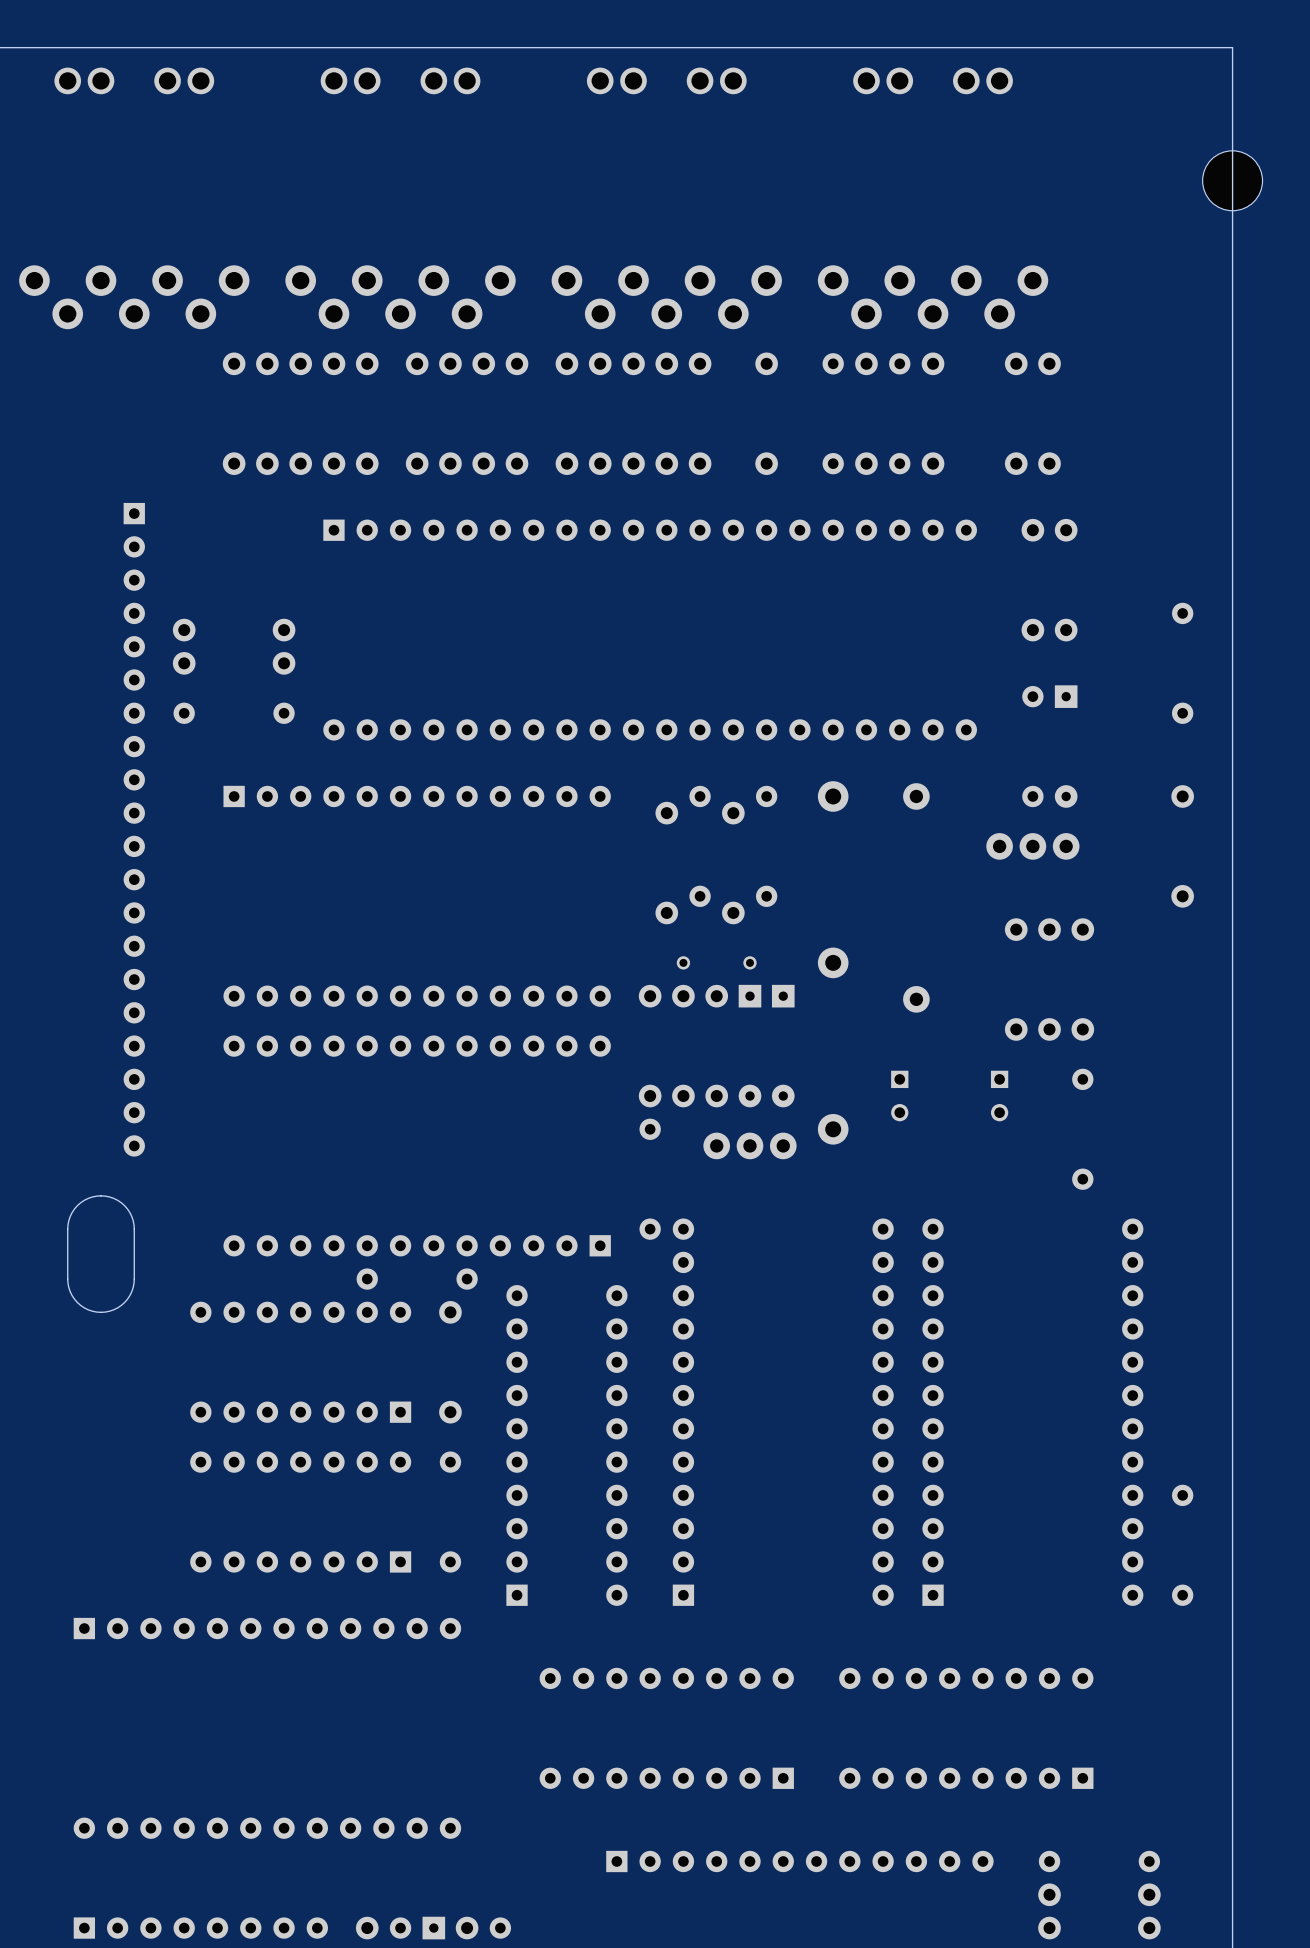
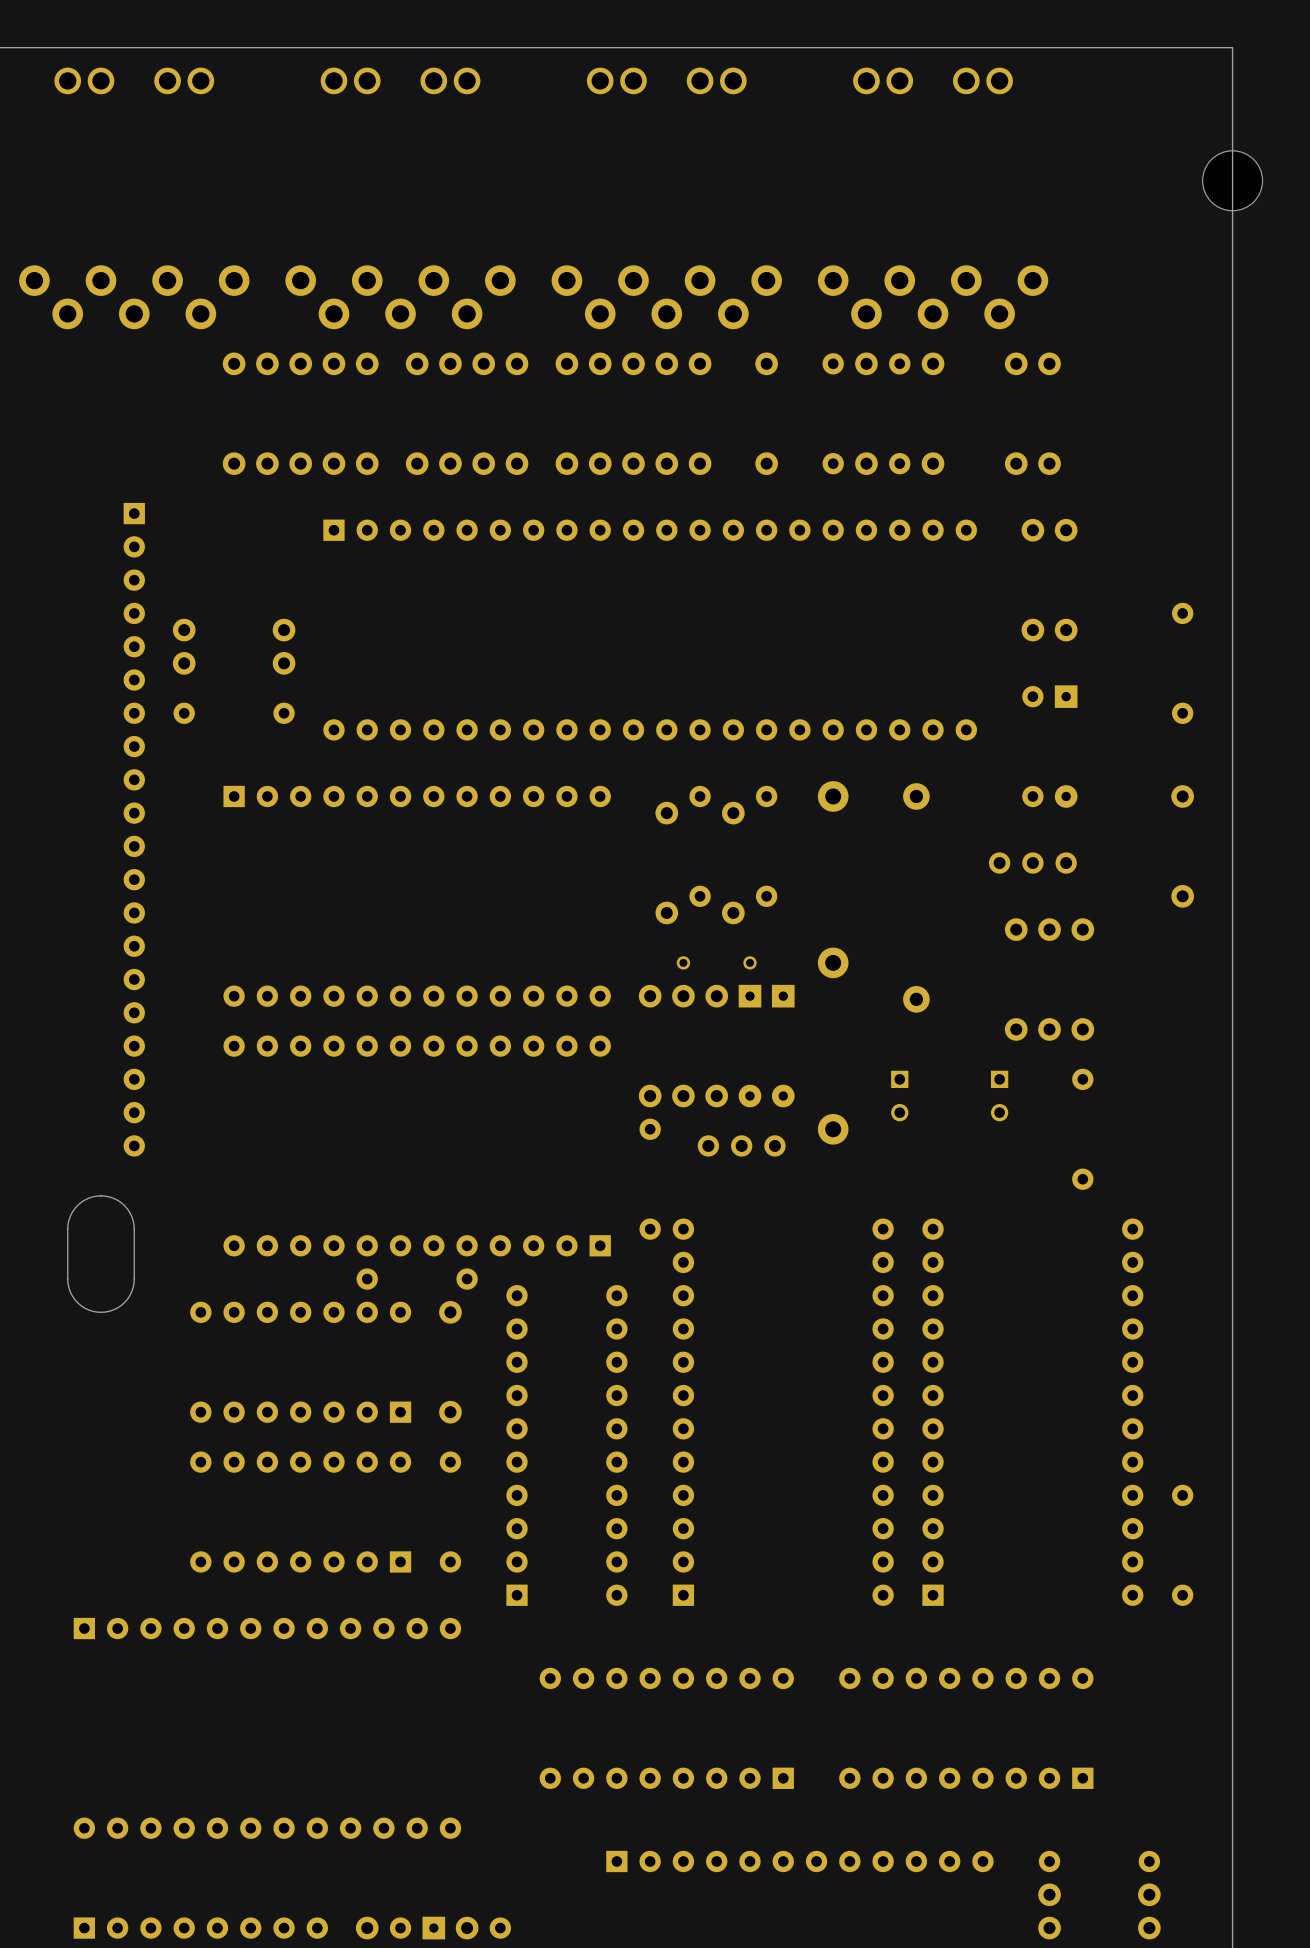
part: (1032, 846) -> none
part: none -> (1032, 863)
part footprint: [703, 1132, 797, 1160] -> [697, 1135, 786, 1157]

